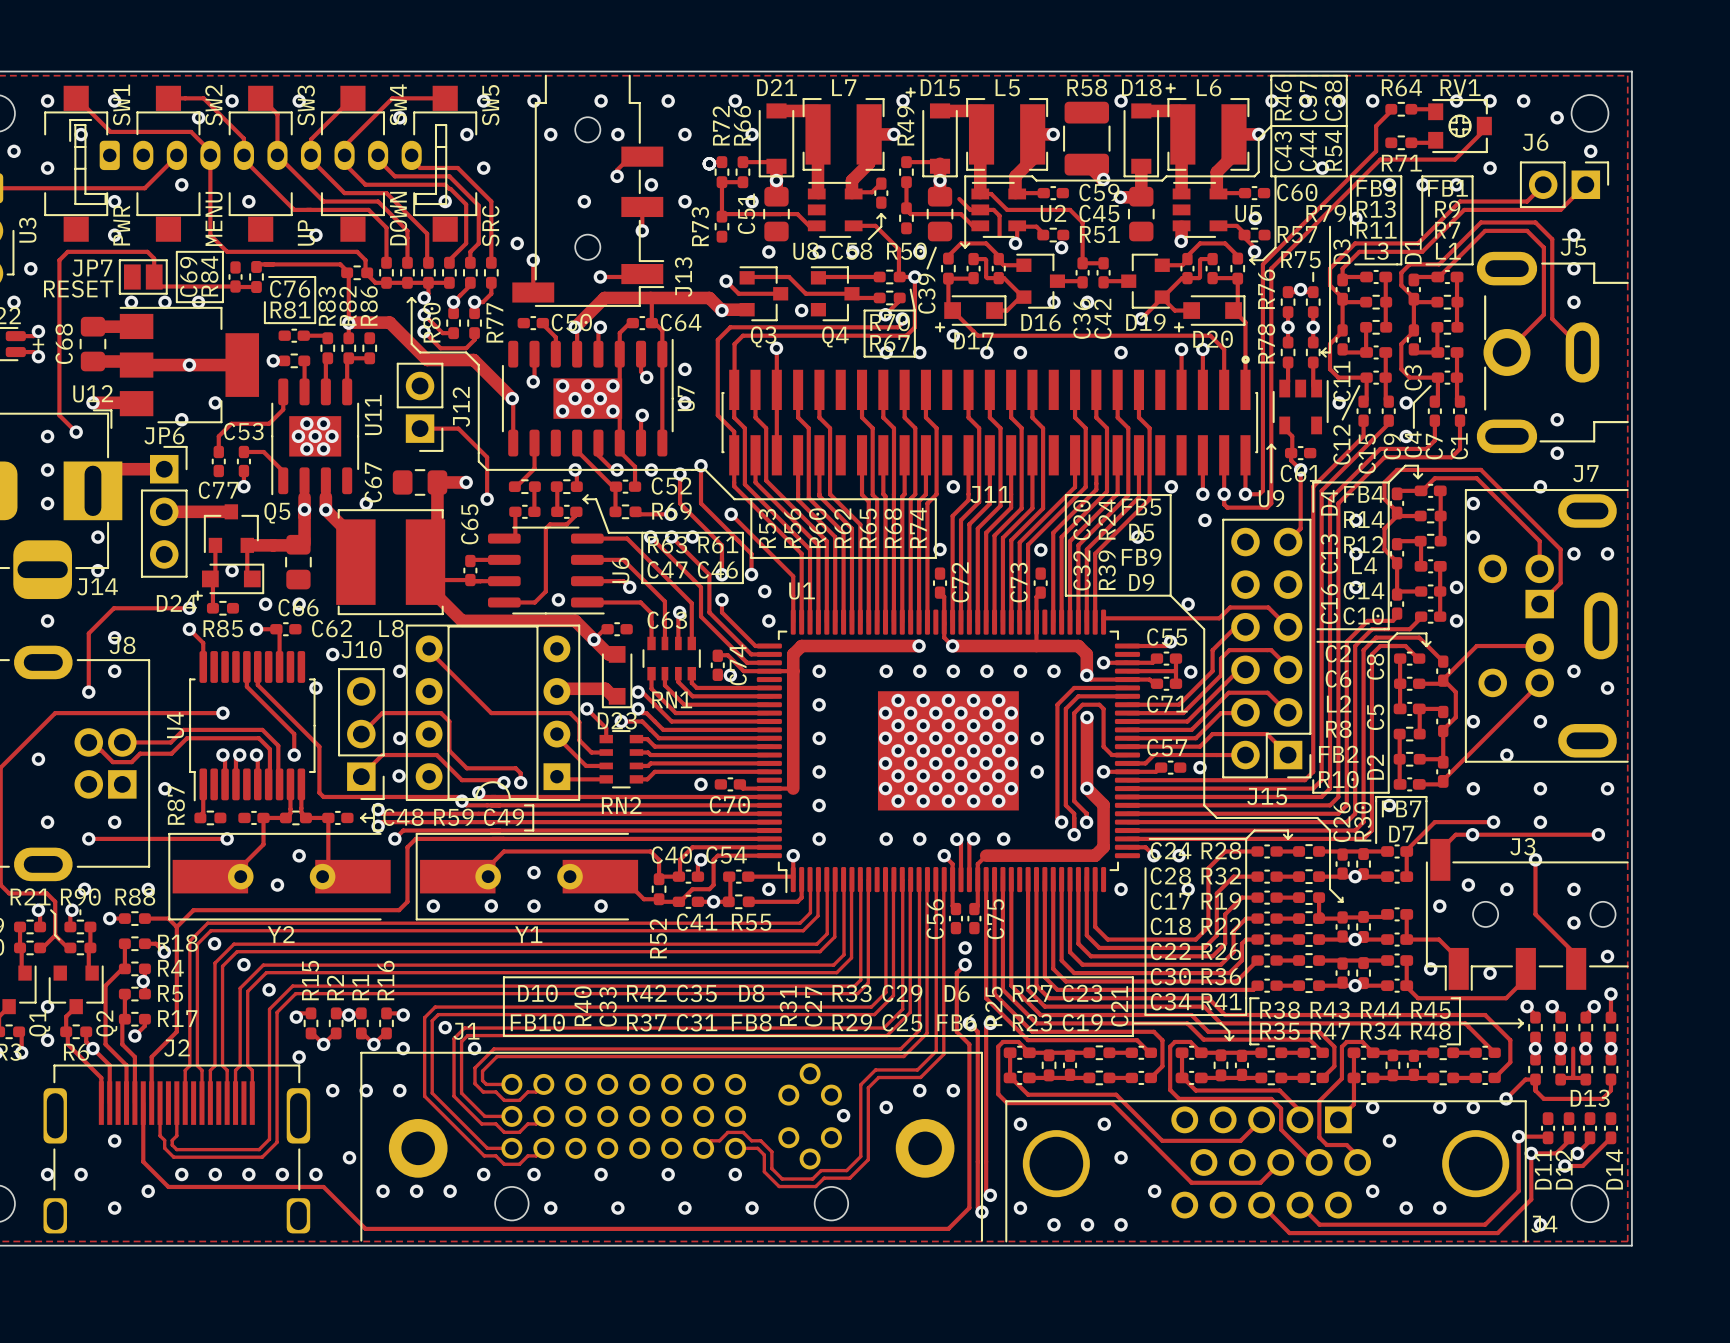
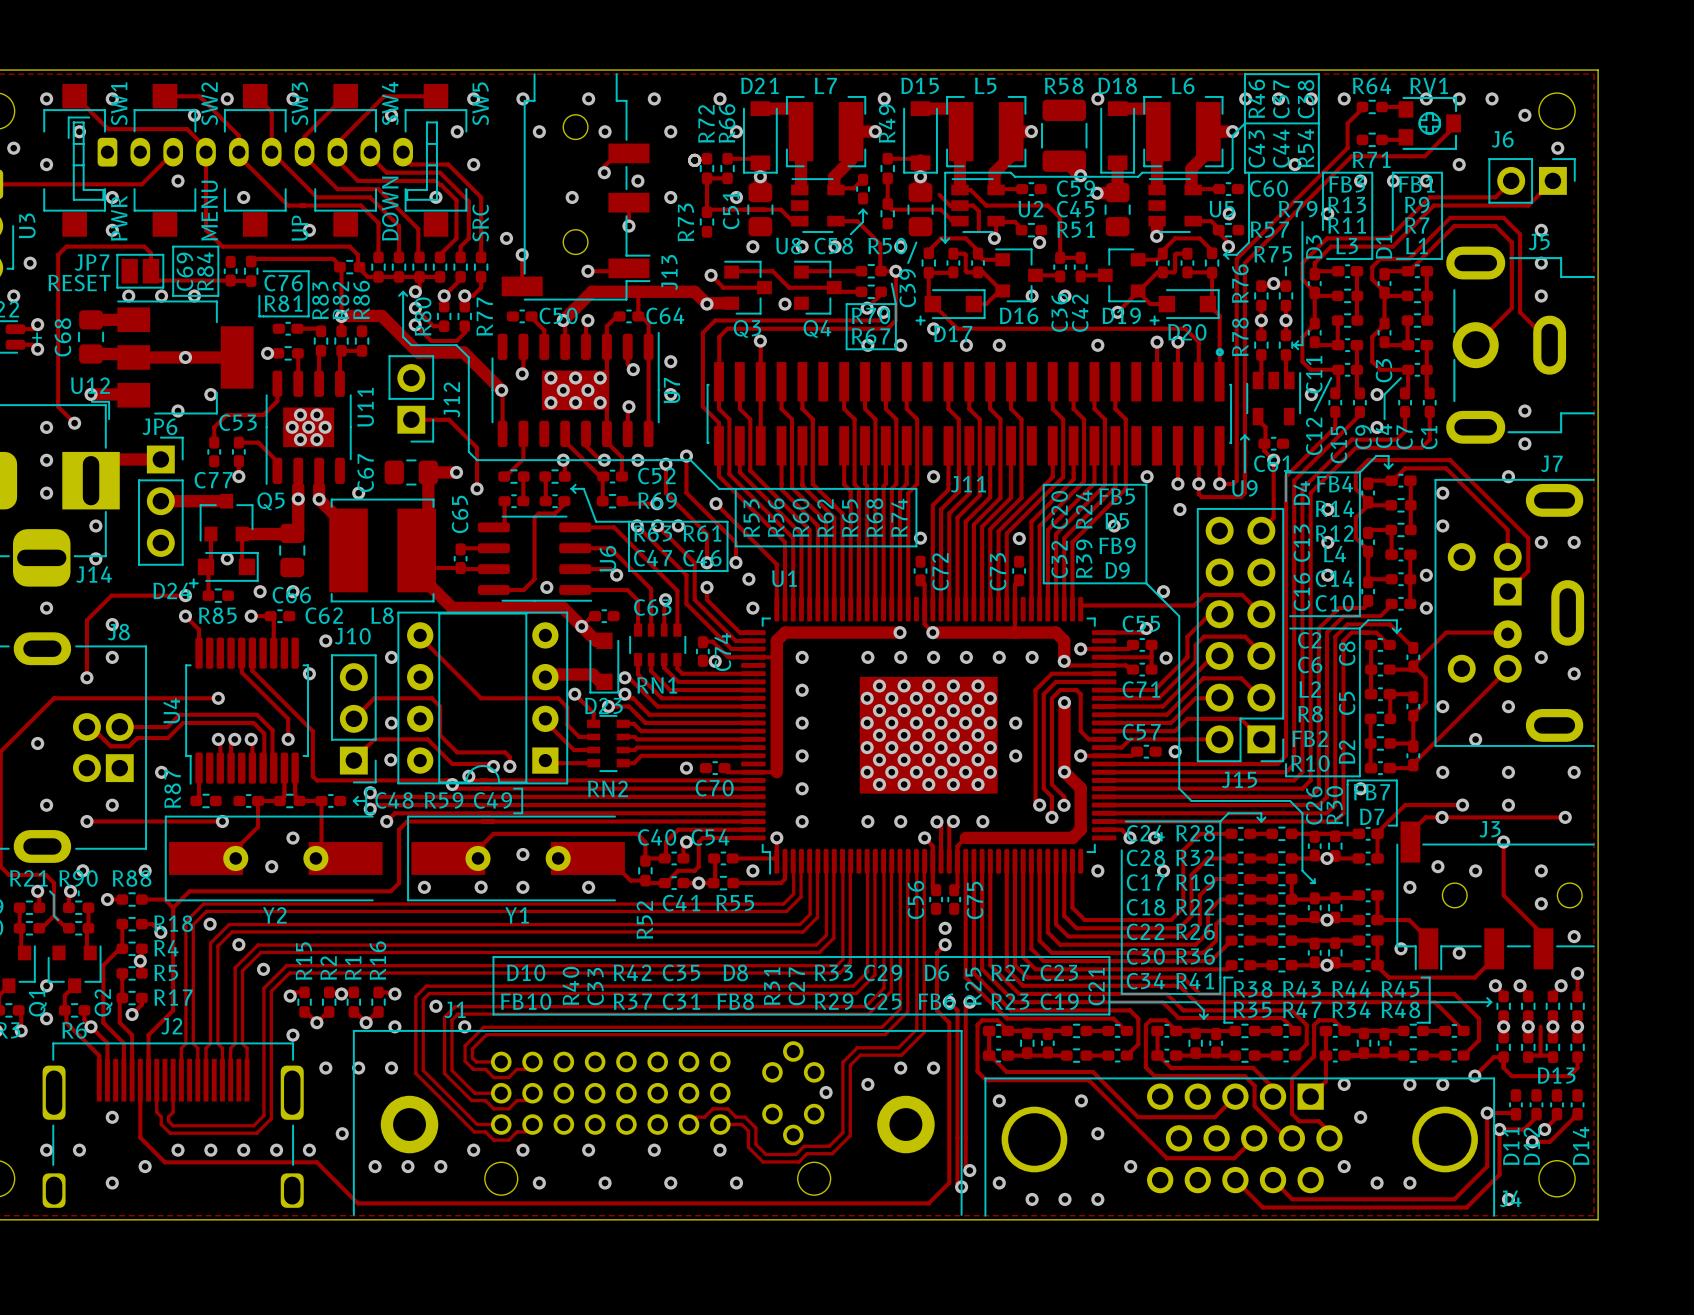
line: (1170, 84) (1170, 92) -> none
line: (910, 88) (910, 96) -> none
line: (1166, 88) (1174, 88) -> none
line: (906, 92) (914, 92) -> none

